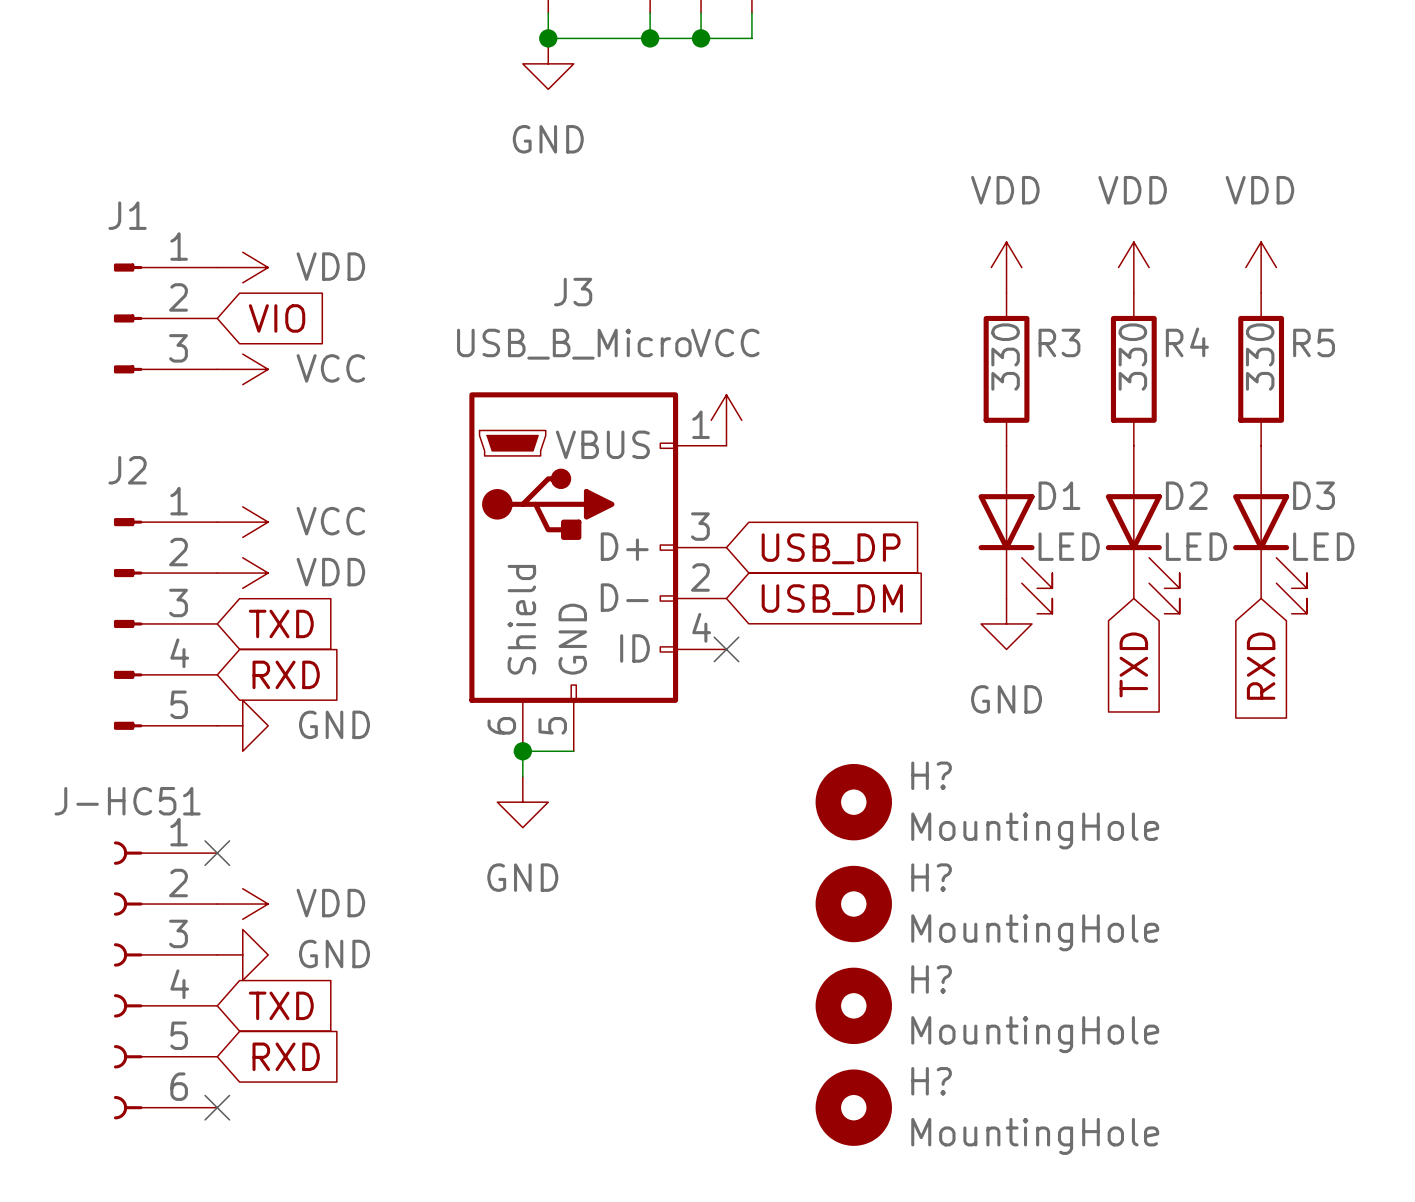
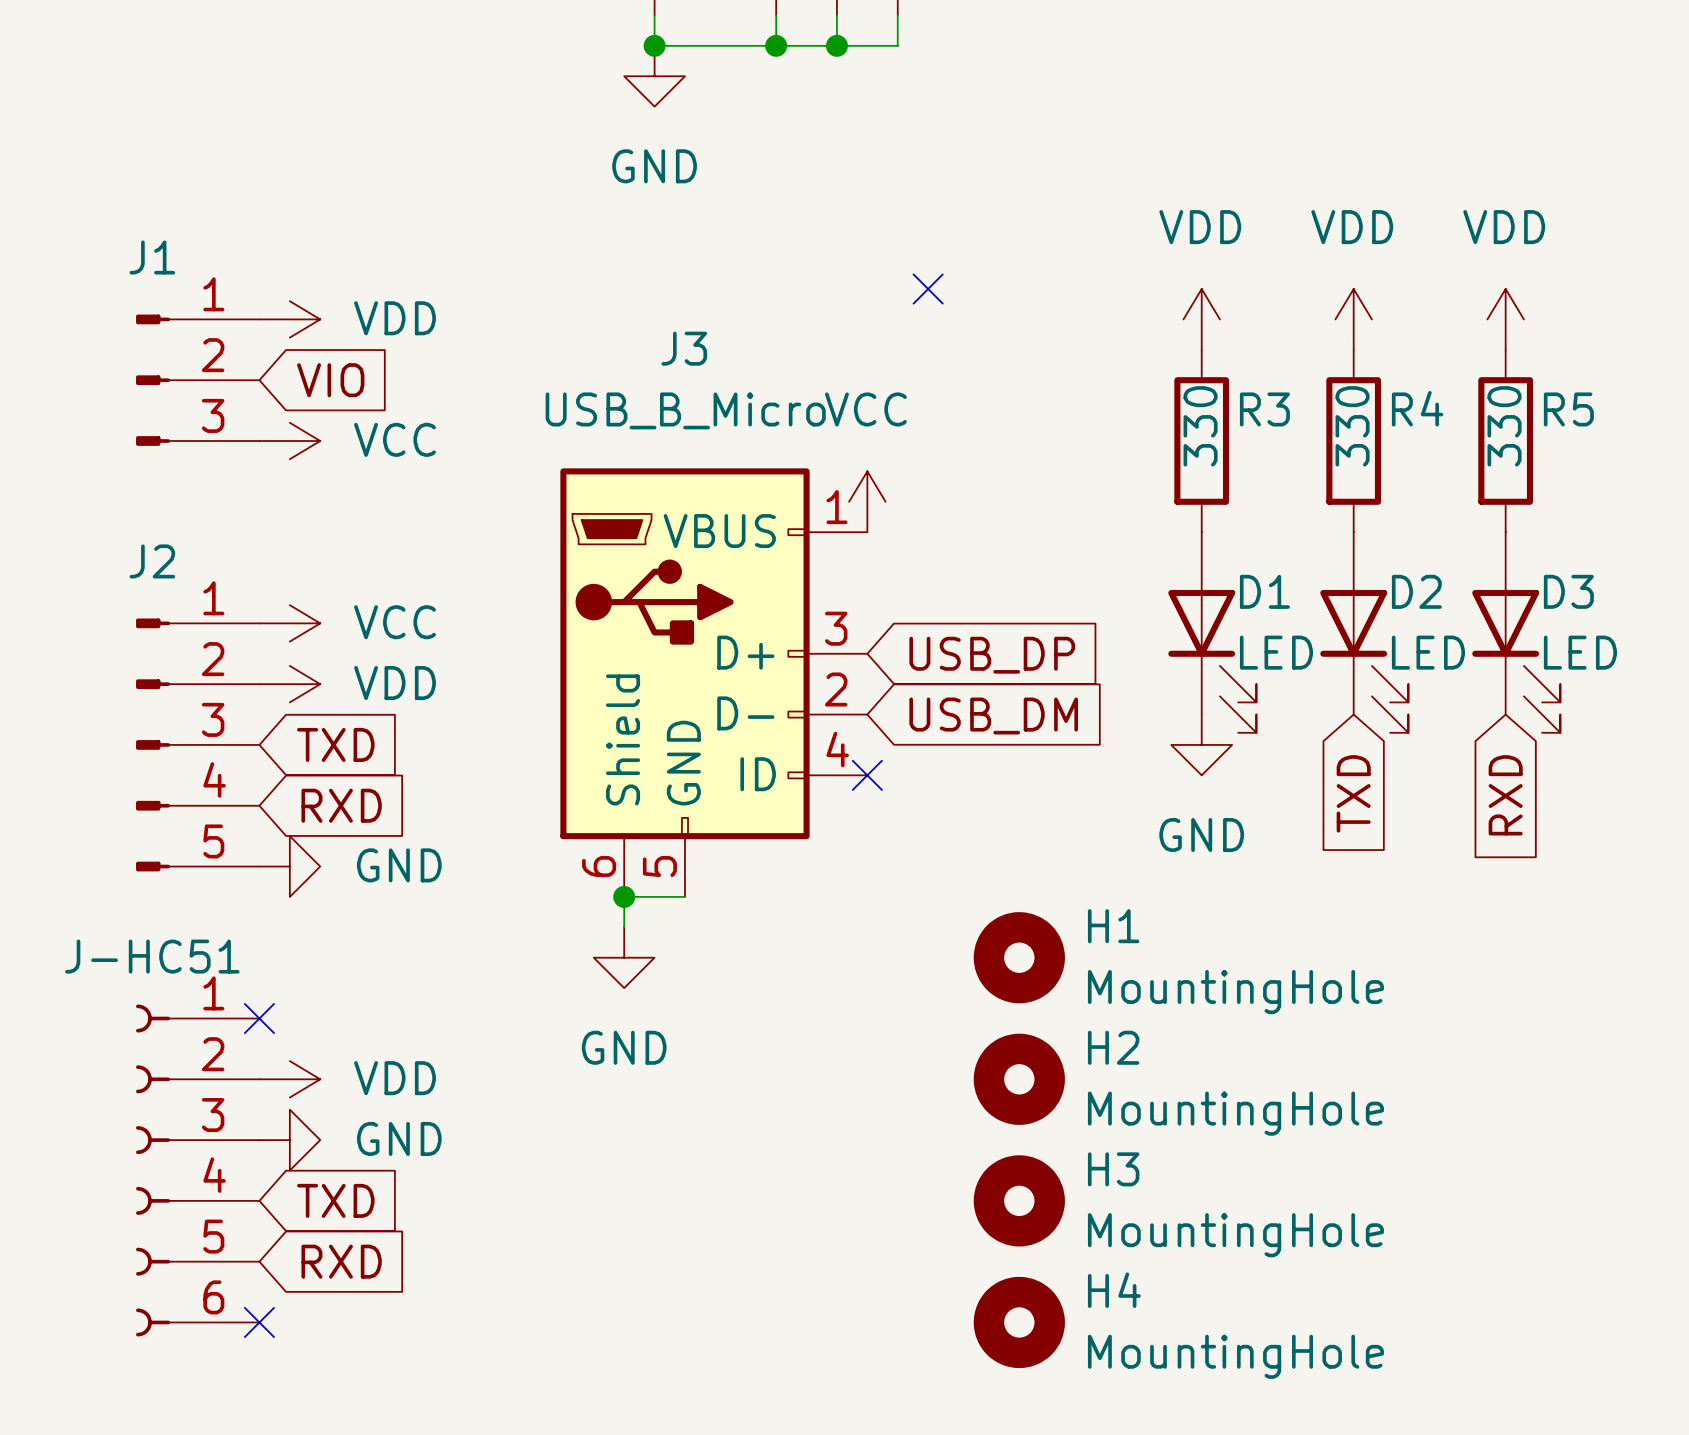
no-connect mark: none -> (928, 289)
H? name: H? (931, 775) -> H1 (1113, 926)
H? name: H? (931, 877) -> H2 (1113, 1047)
H? name: H? (931, 979) -> H3 (1113, 1169)
H? name: H? (931, 1081) -> H4 (1114, 1290)

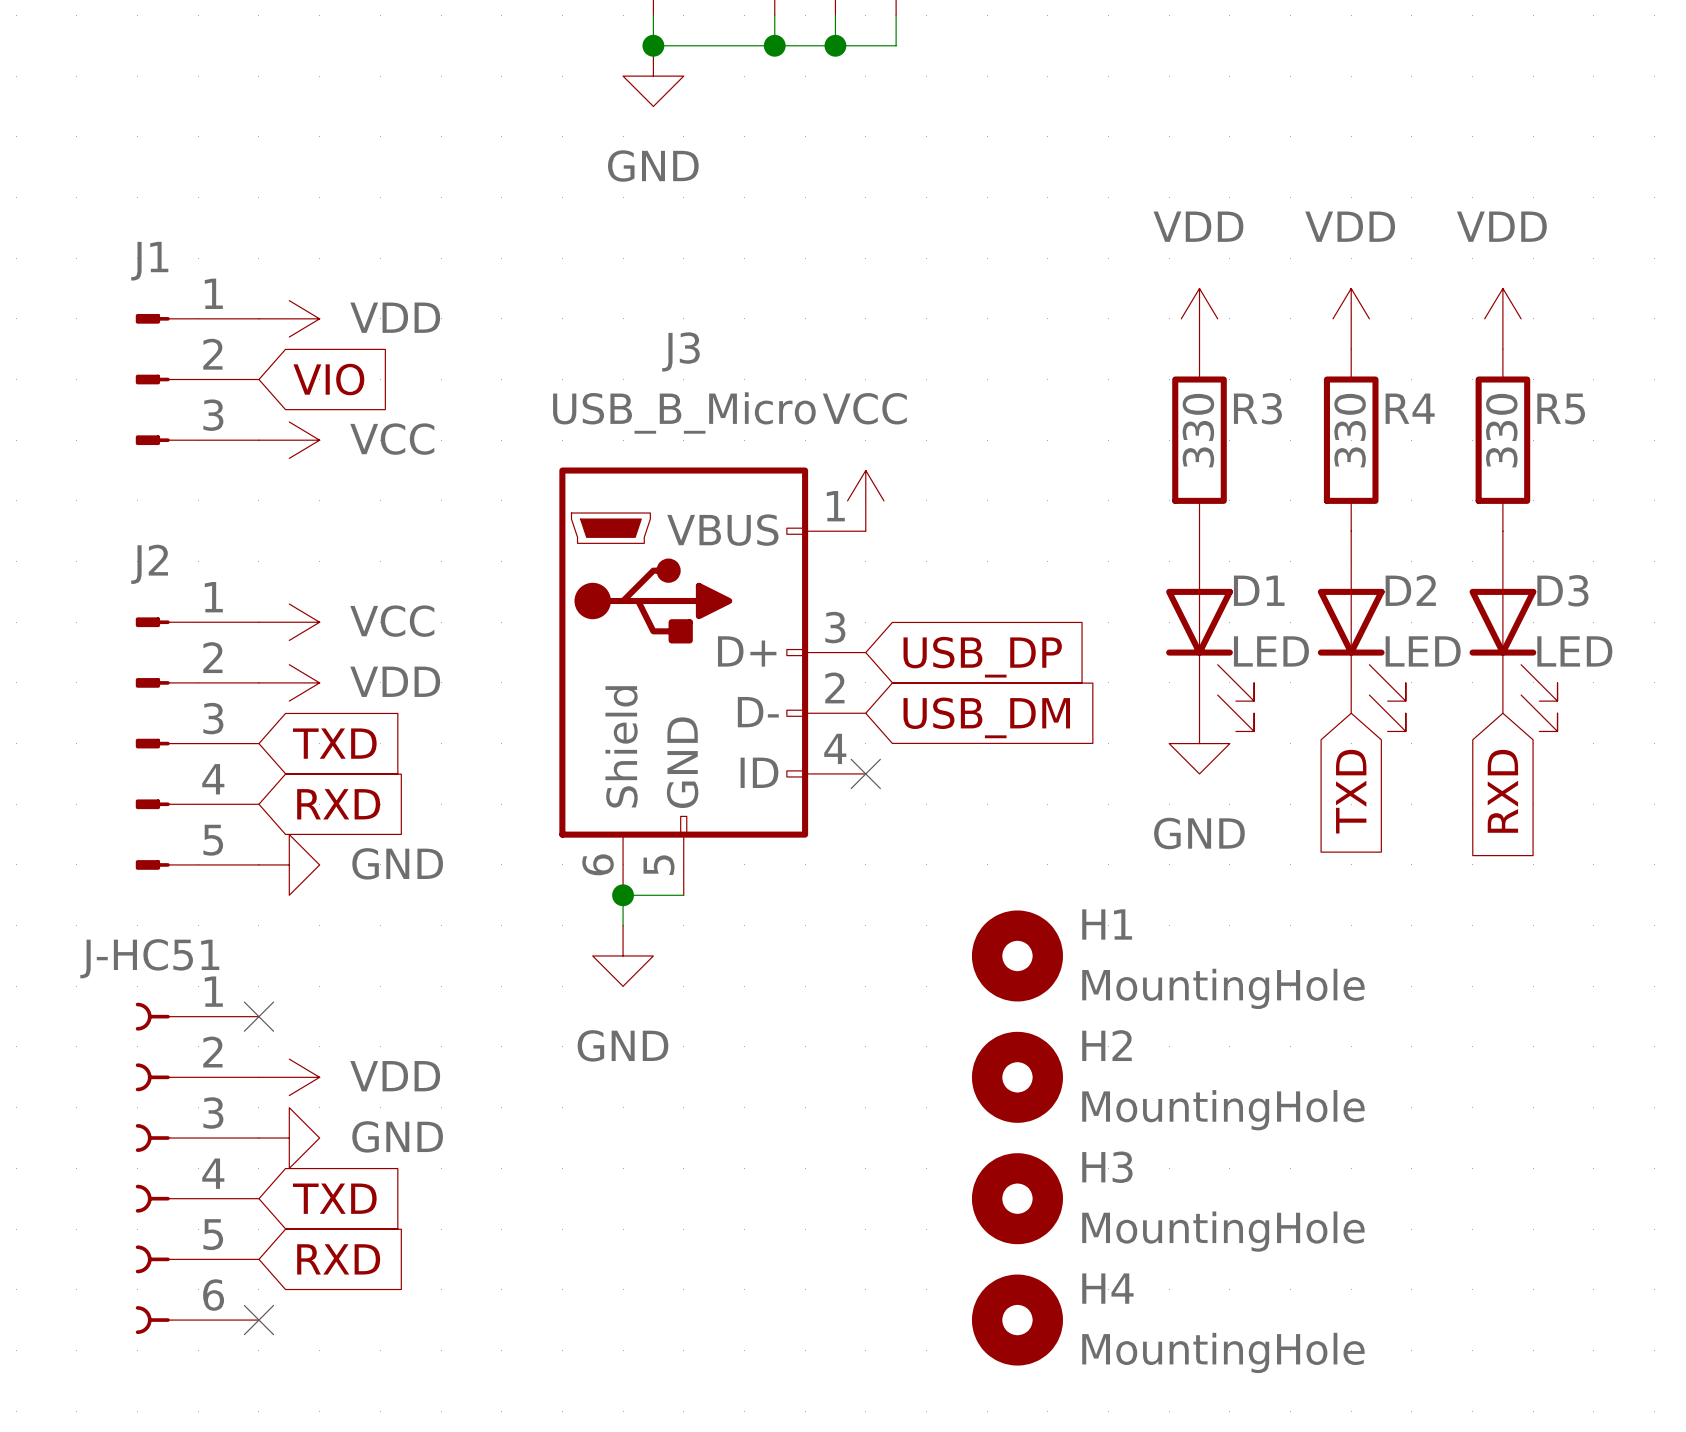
no-connect mark: (928, 289) -> none

